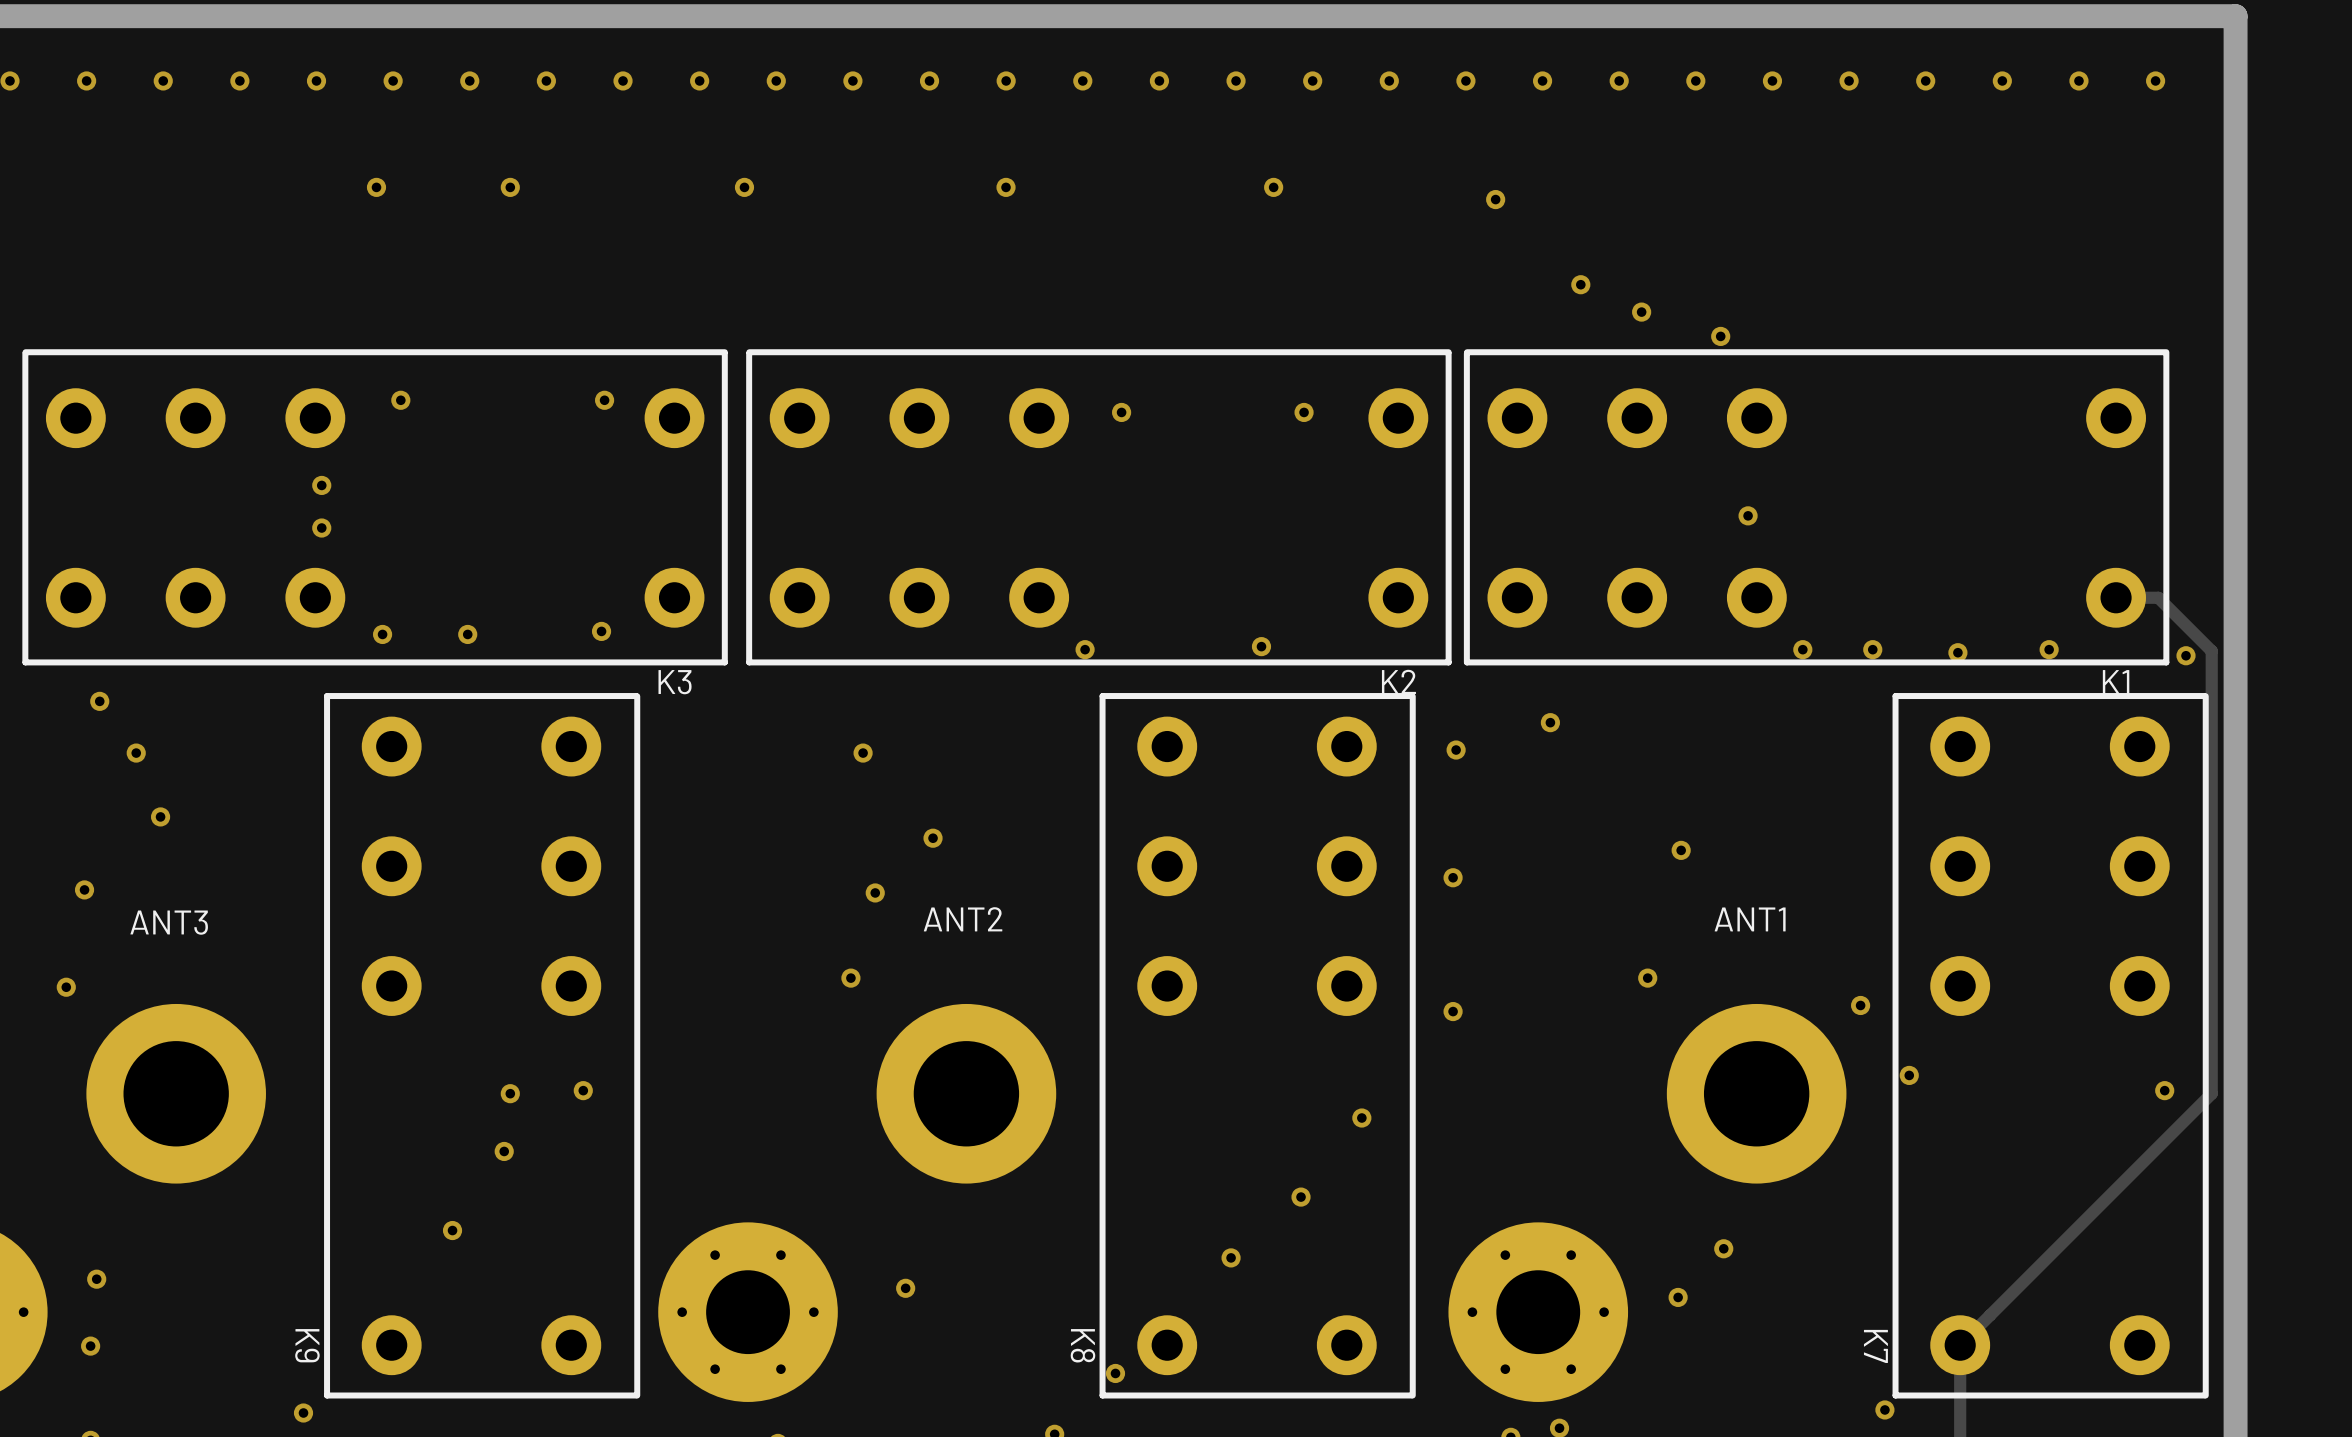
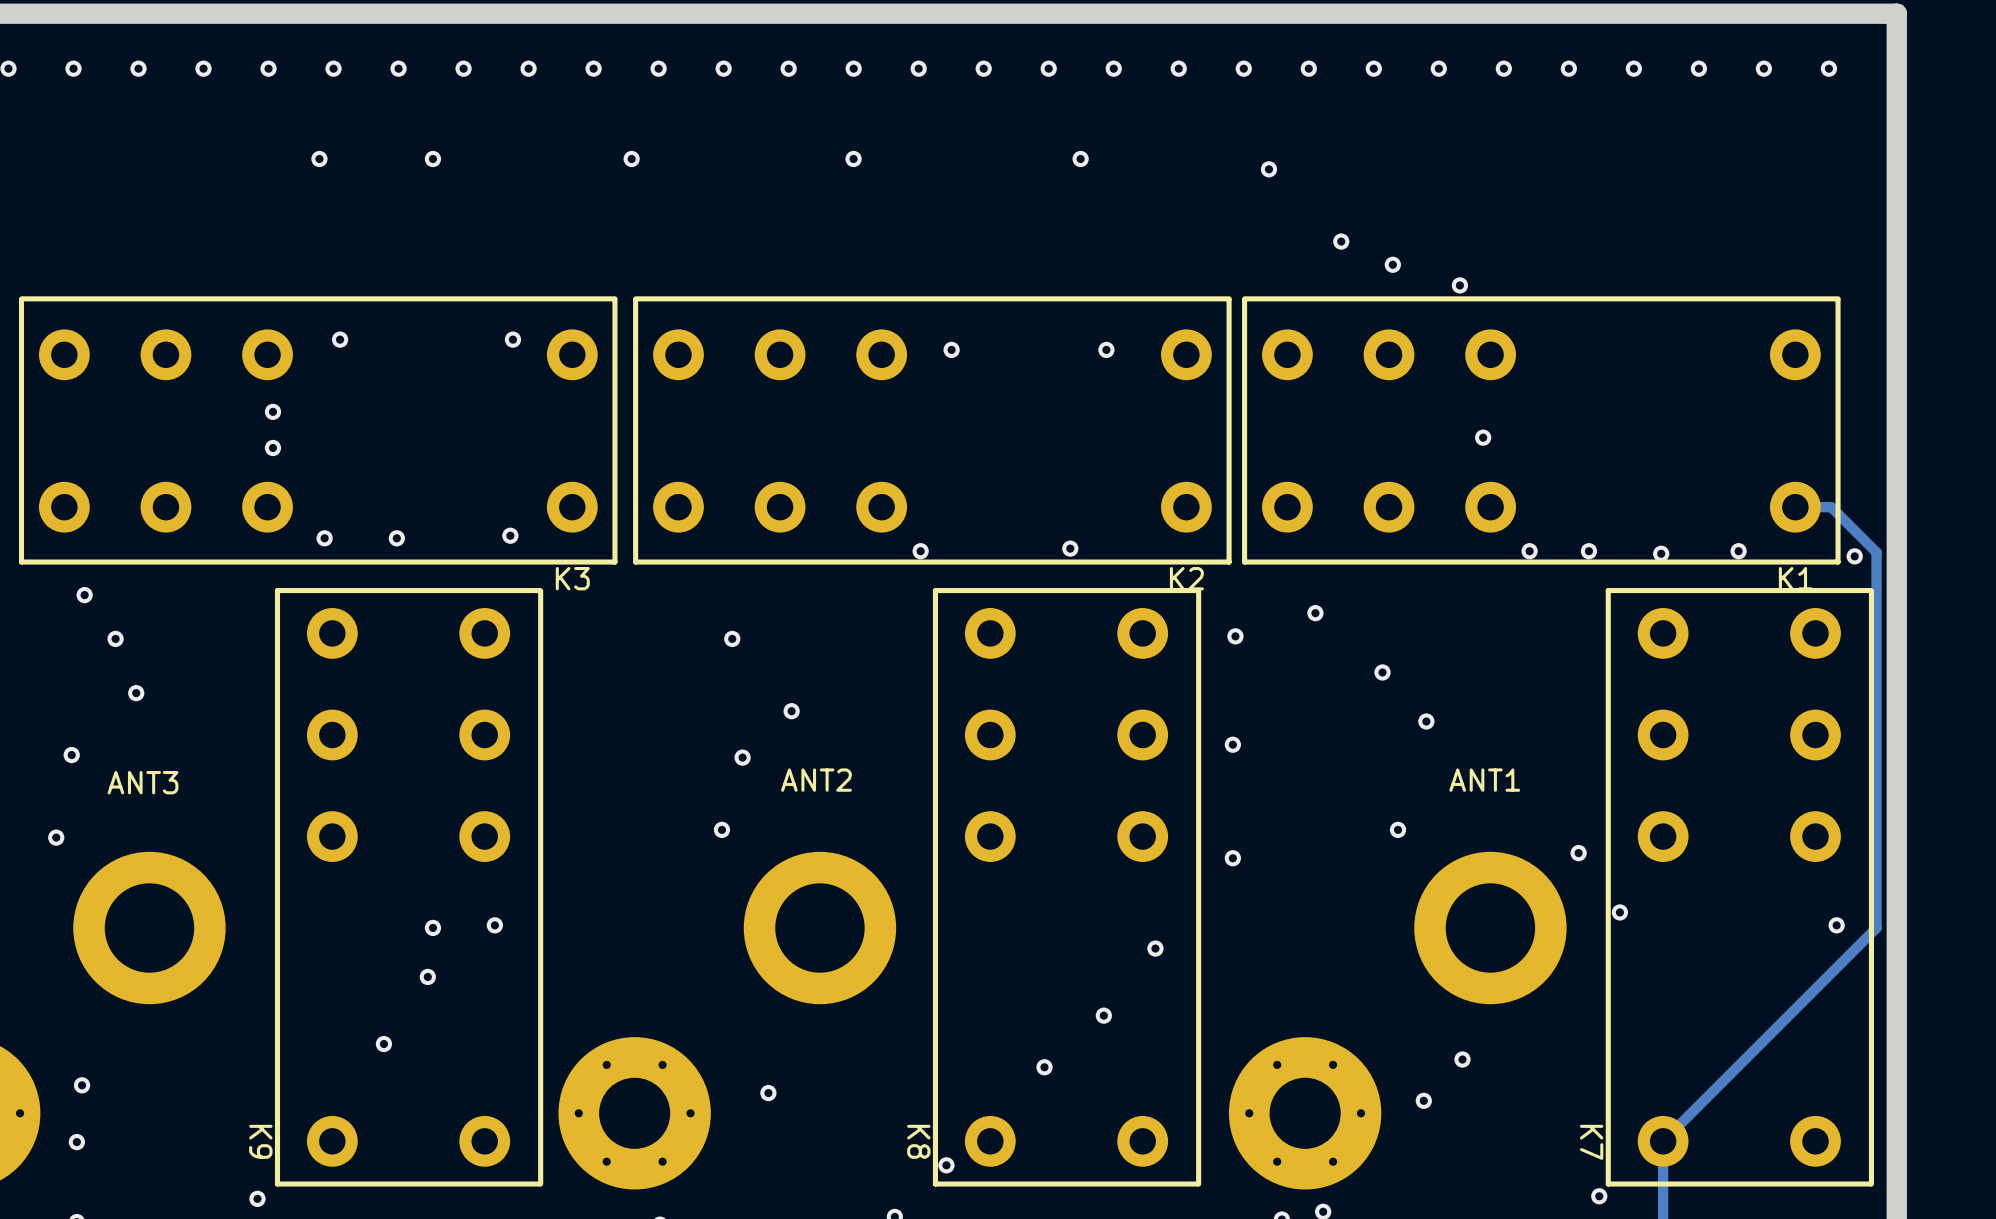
via: none -> (1382, 672)

